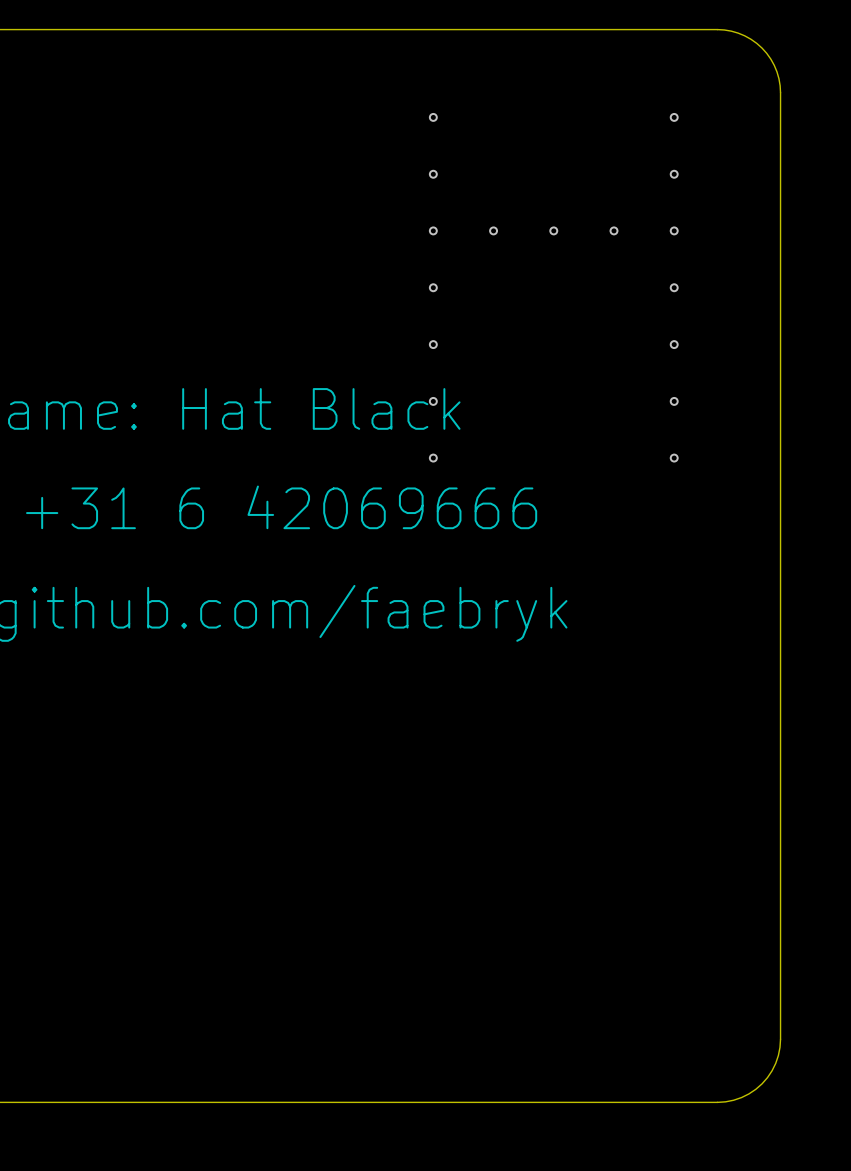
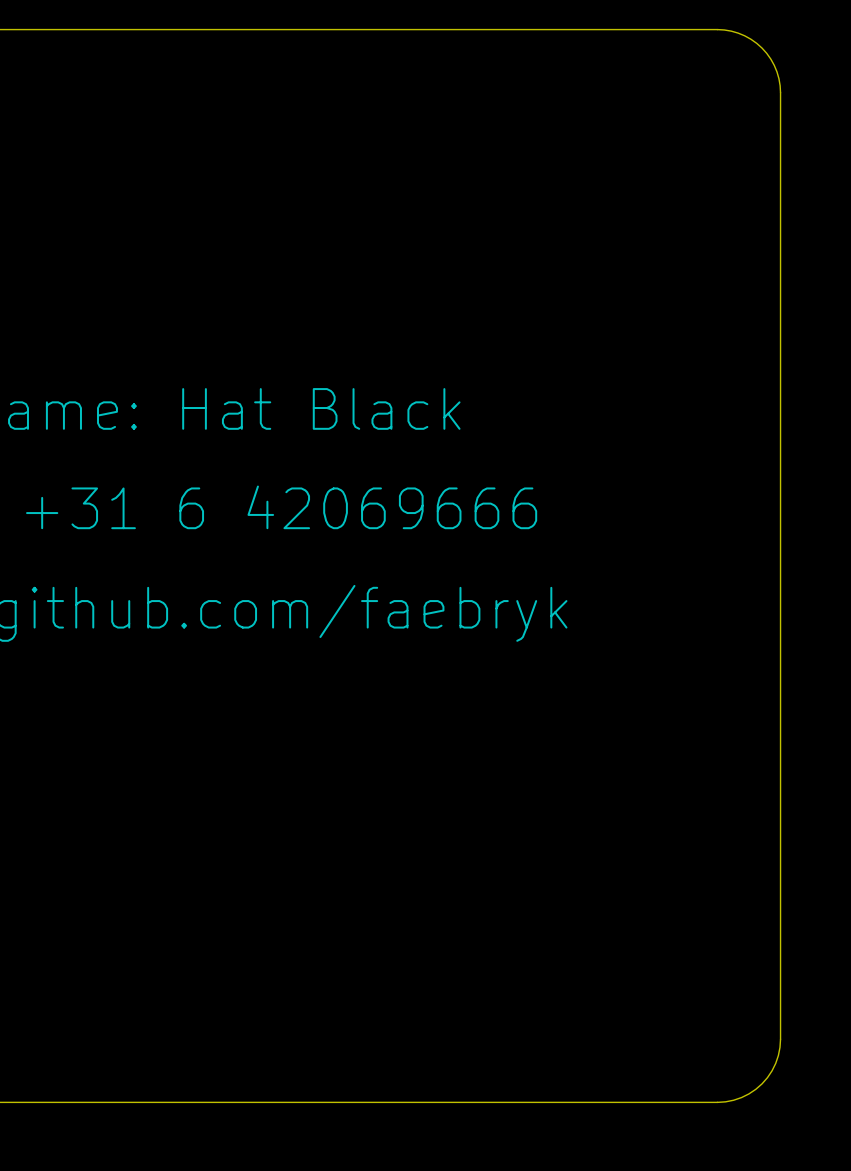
via: (433, 117) -> none
via: (674, 117) -> none
via: (433, 174) -> none
via: (674, 174) -> none
via: (433, 230) -> none
via: (493, 230) -> none
via: (553, 230) -> none
via: (613, 230) -> none
via: (674, 230) -> none
via: (433, 287) -> none
via: (674, 287) -> none
via: (433, 344) -> none
via: (674, 344) -> none
via: (433, 401) -> none
via: (674, 401) -> none
via: (433, 458) -> none
via: (674, 458) -> none

